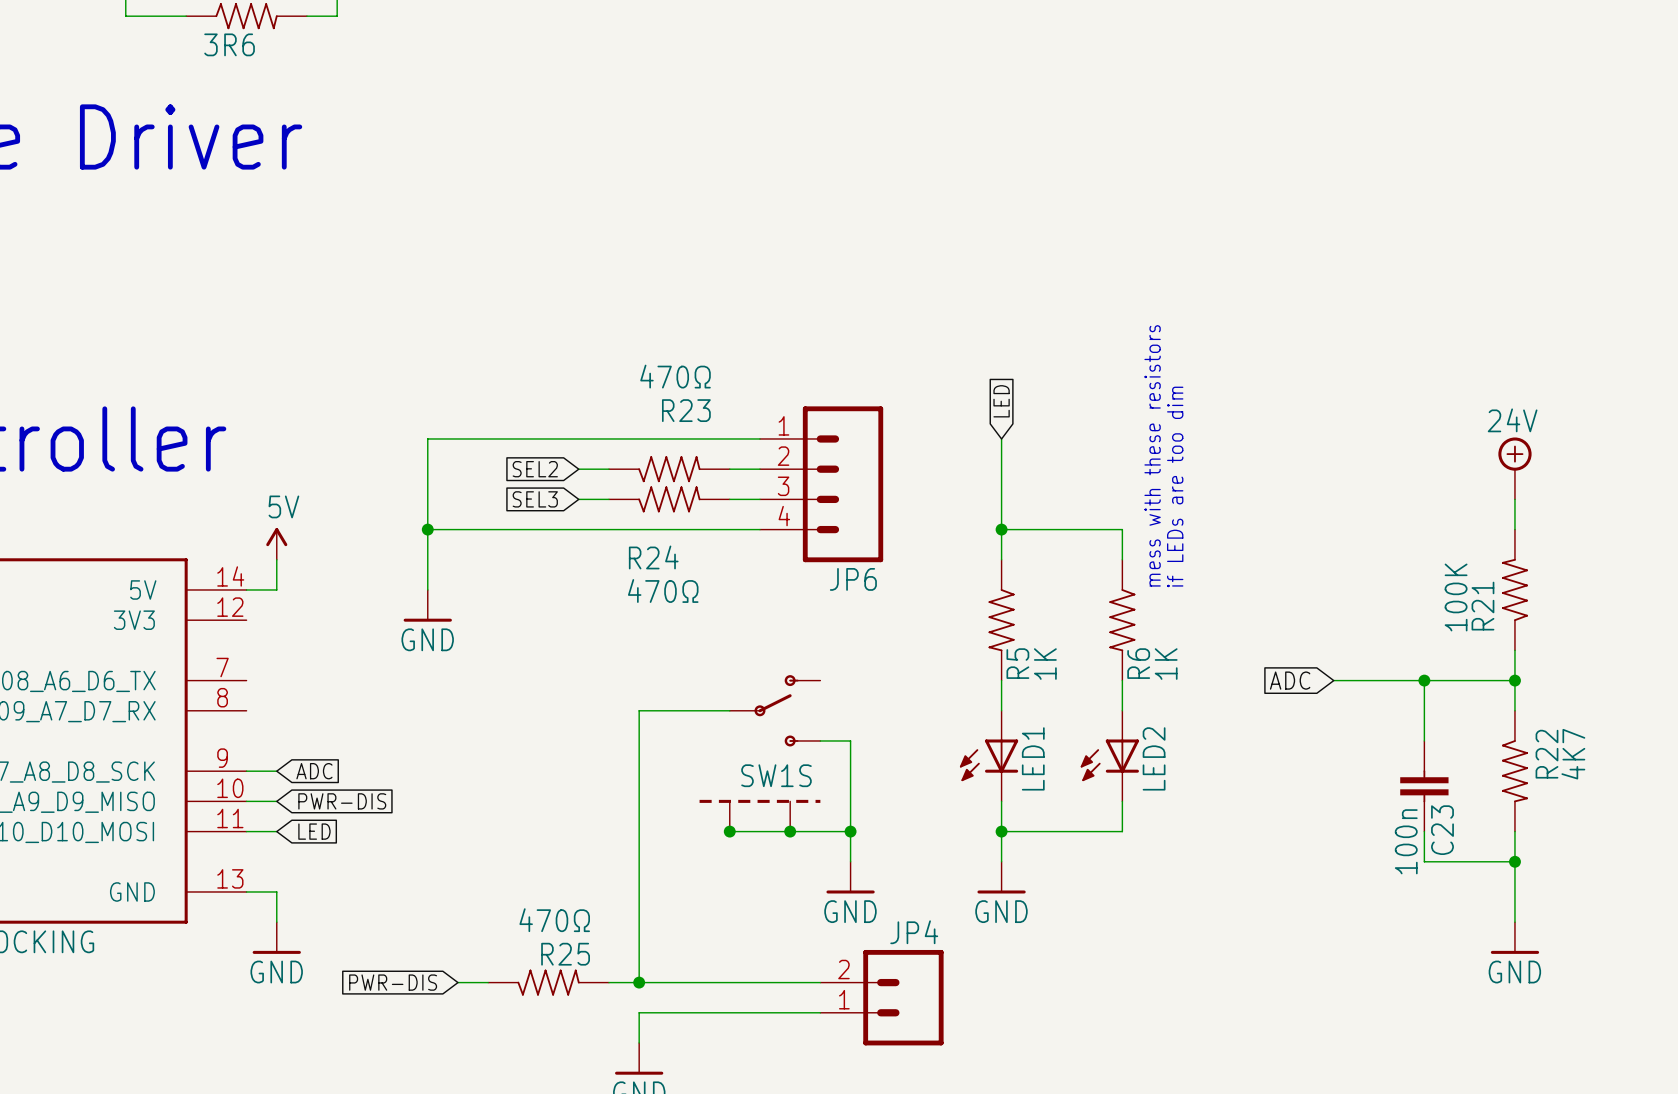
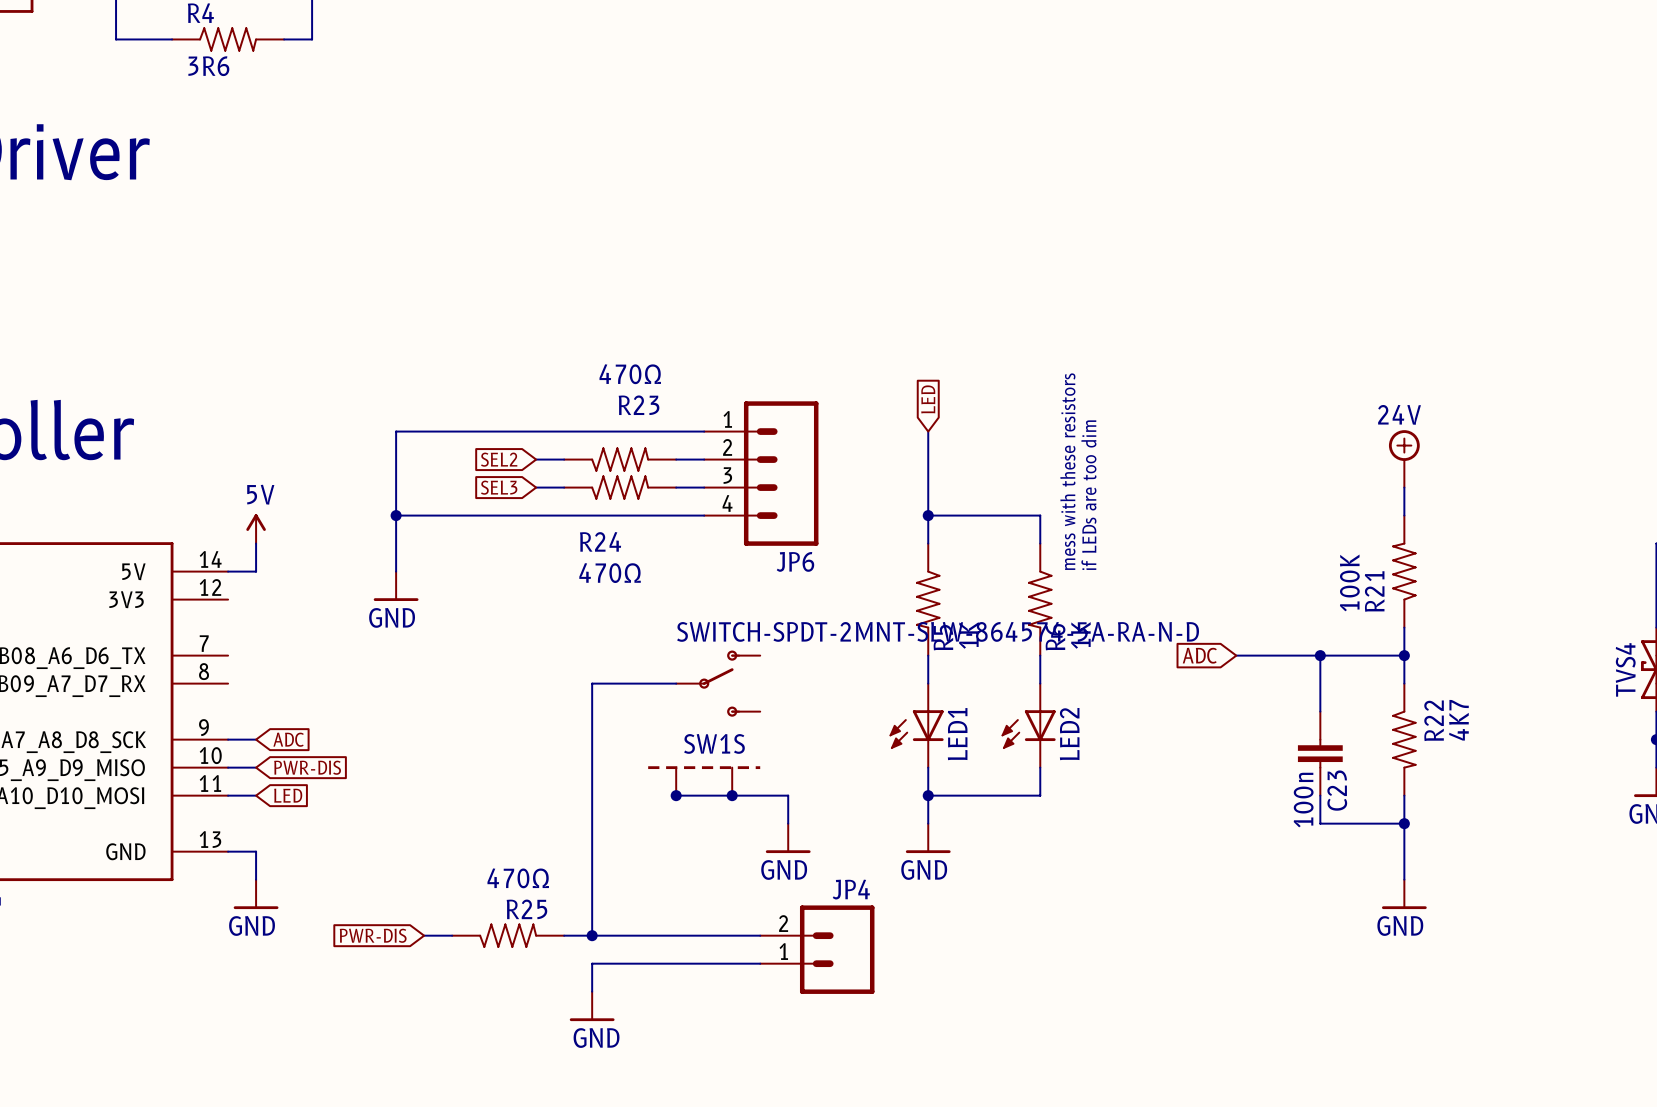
SW1S value: none -> SWITCH-SPDT-2MNT-SLW-864574-5A-RA-N-D (938, 631)
wire: (820, 740) (850, 740) (850, 831) -> none
junction: (850, 831) -> none

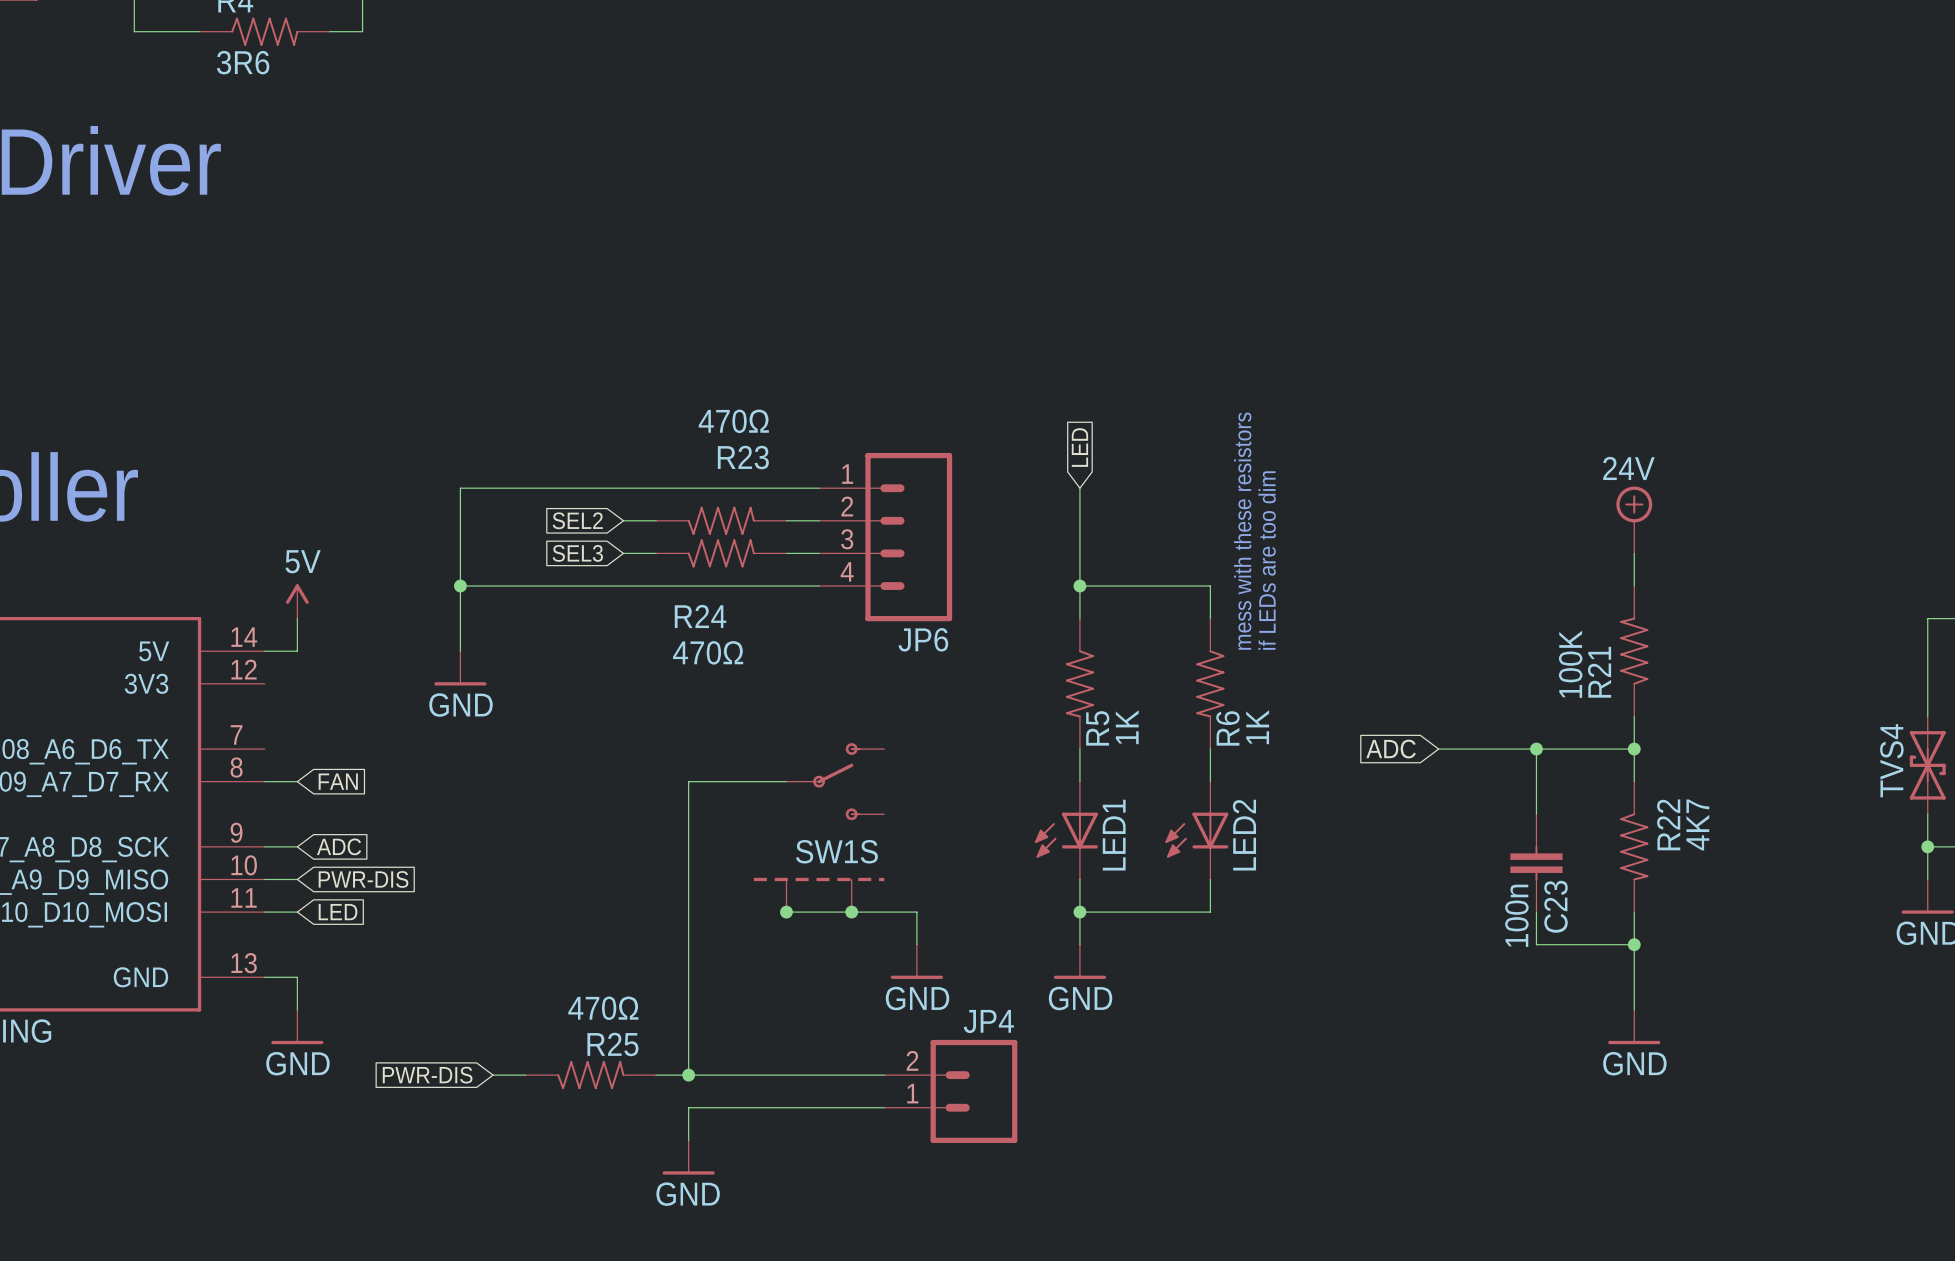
SW1S value: SWITCH-SPDT-2MNT-SLW-864574-5A-RA-N-D (938, 631) -> none
wire: none -> (264, 781) (297, 781)
global label: none -> FAN (338, 781)

